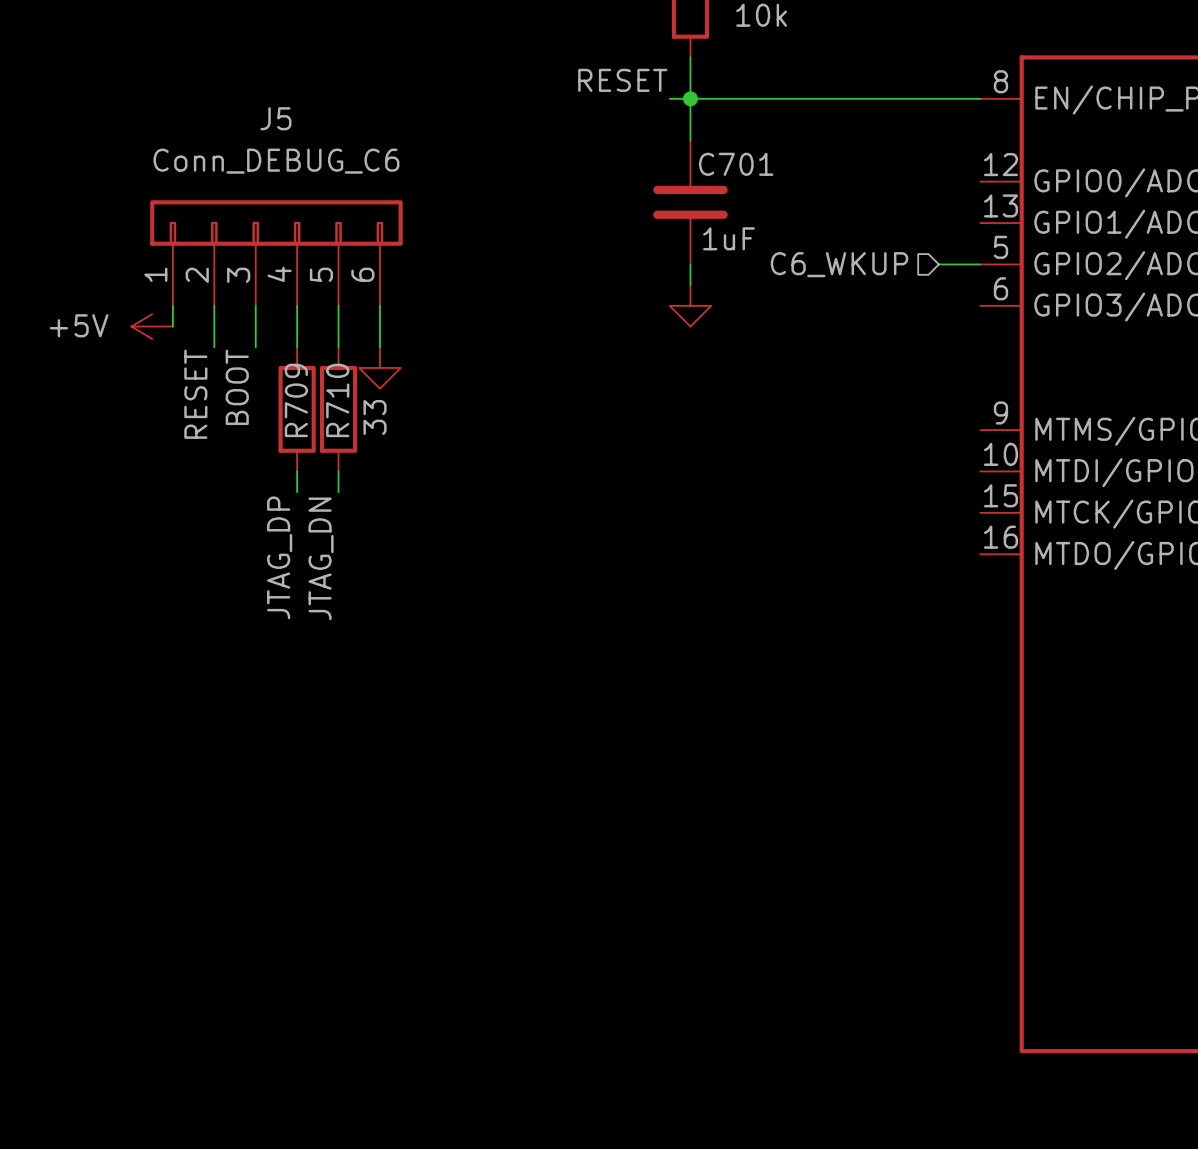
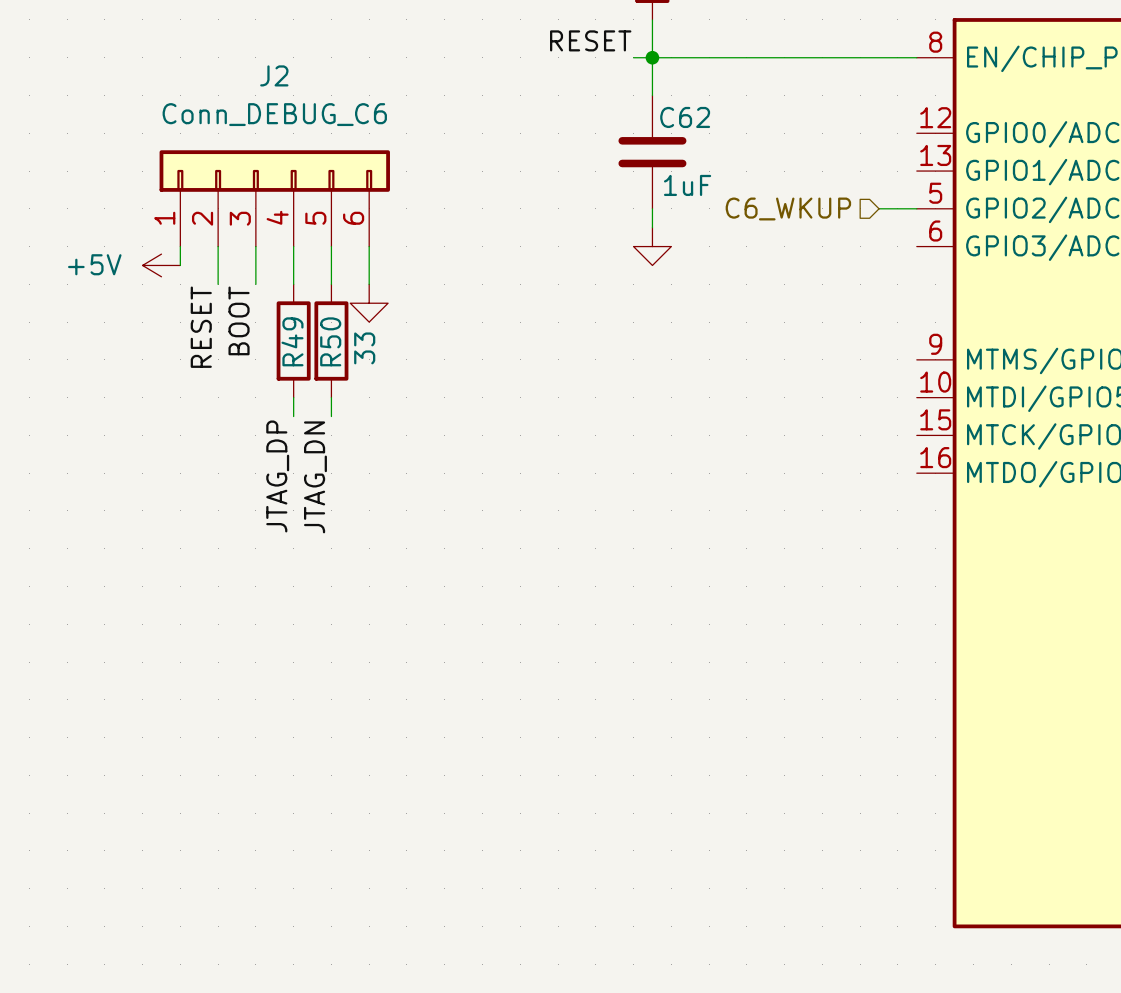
J5 name: J5 (275, 118) -> J2 (274, 75)
C701 name: C701 (736, 164) -> C62 (685, 117)
R709 name: R709 (296, 400) -> R49 (292, 341)
R710 name: R710 (337, 400) -> R50 (330, 341)

